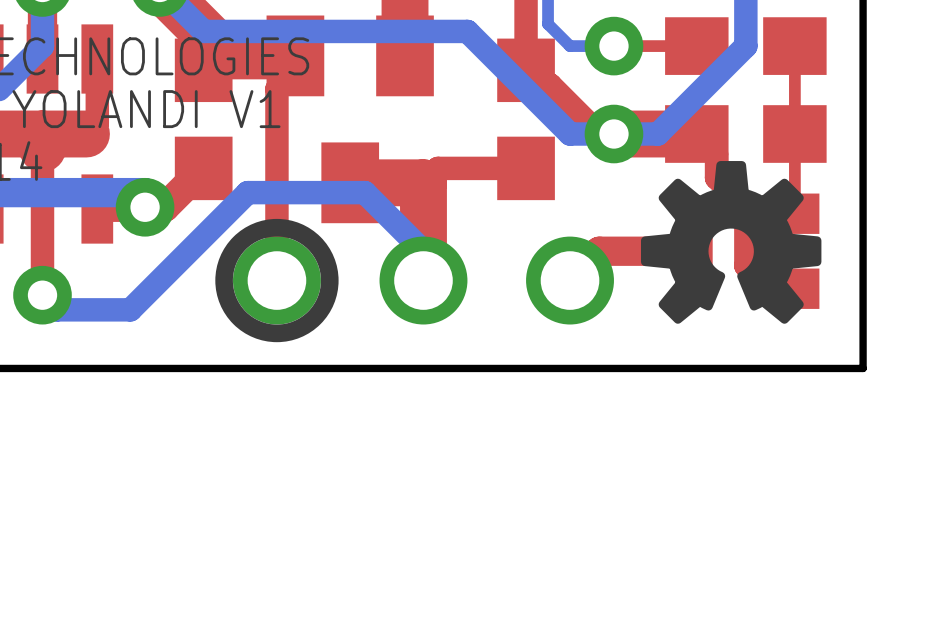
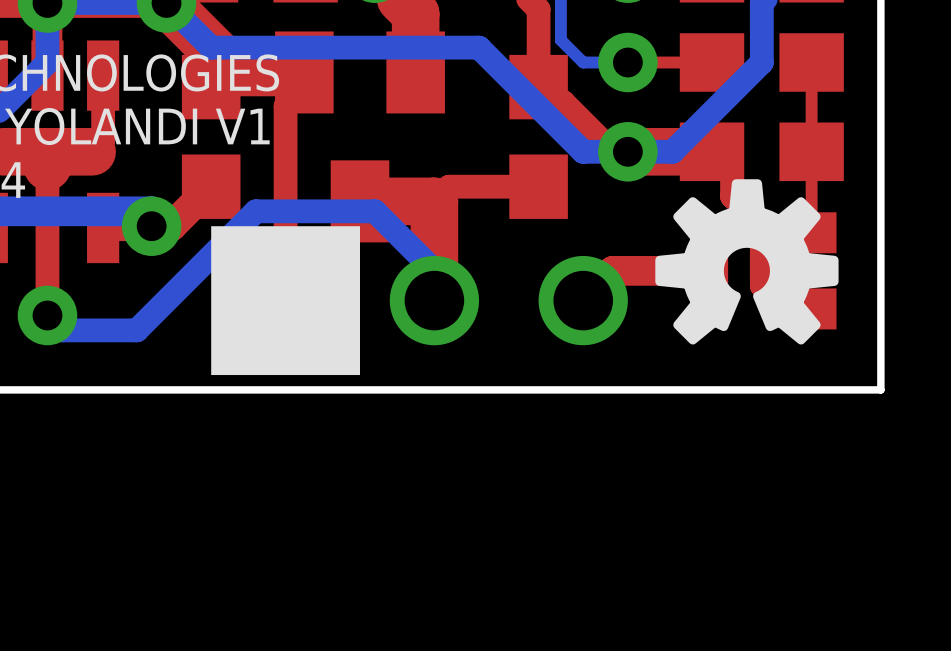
drawing shape: [215, 218, 339, 343] -> [211, 226, 361, 376]

